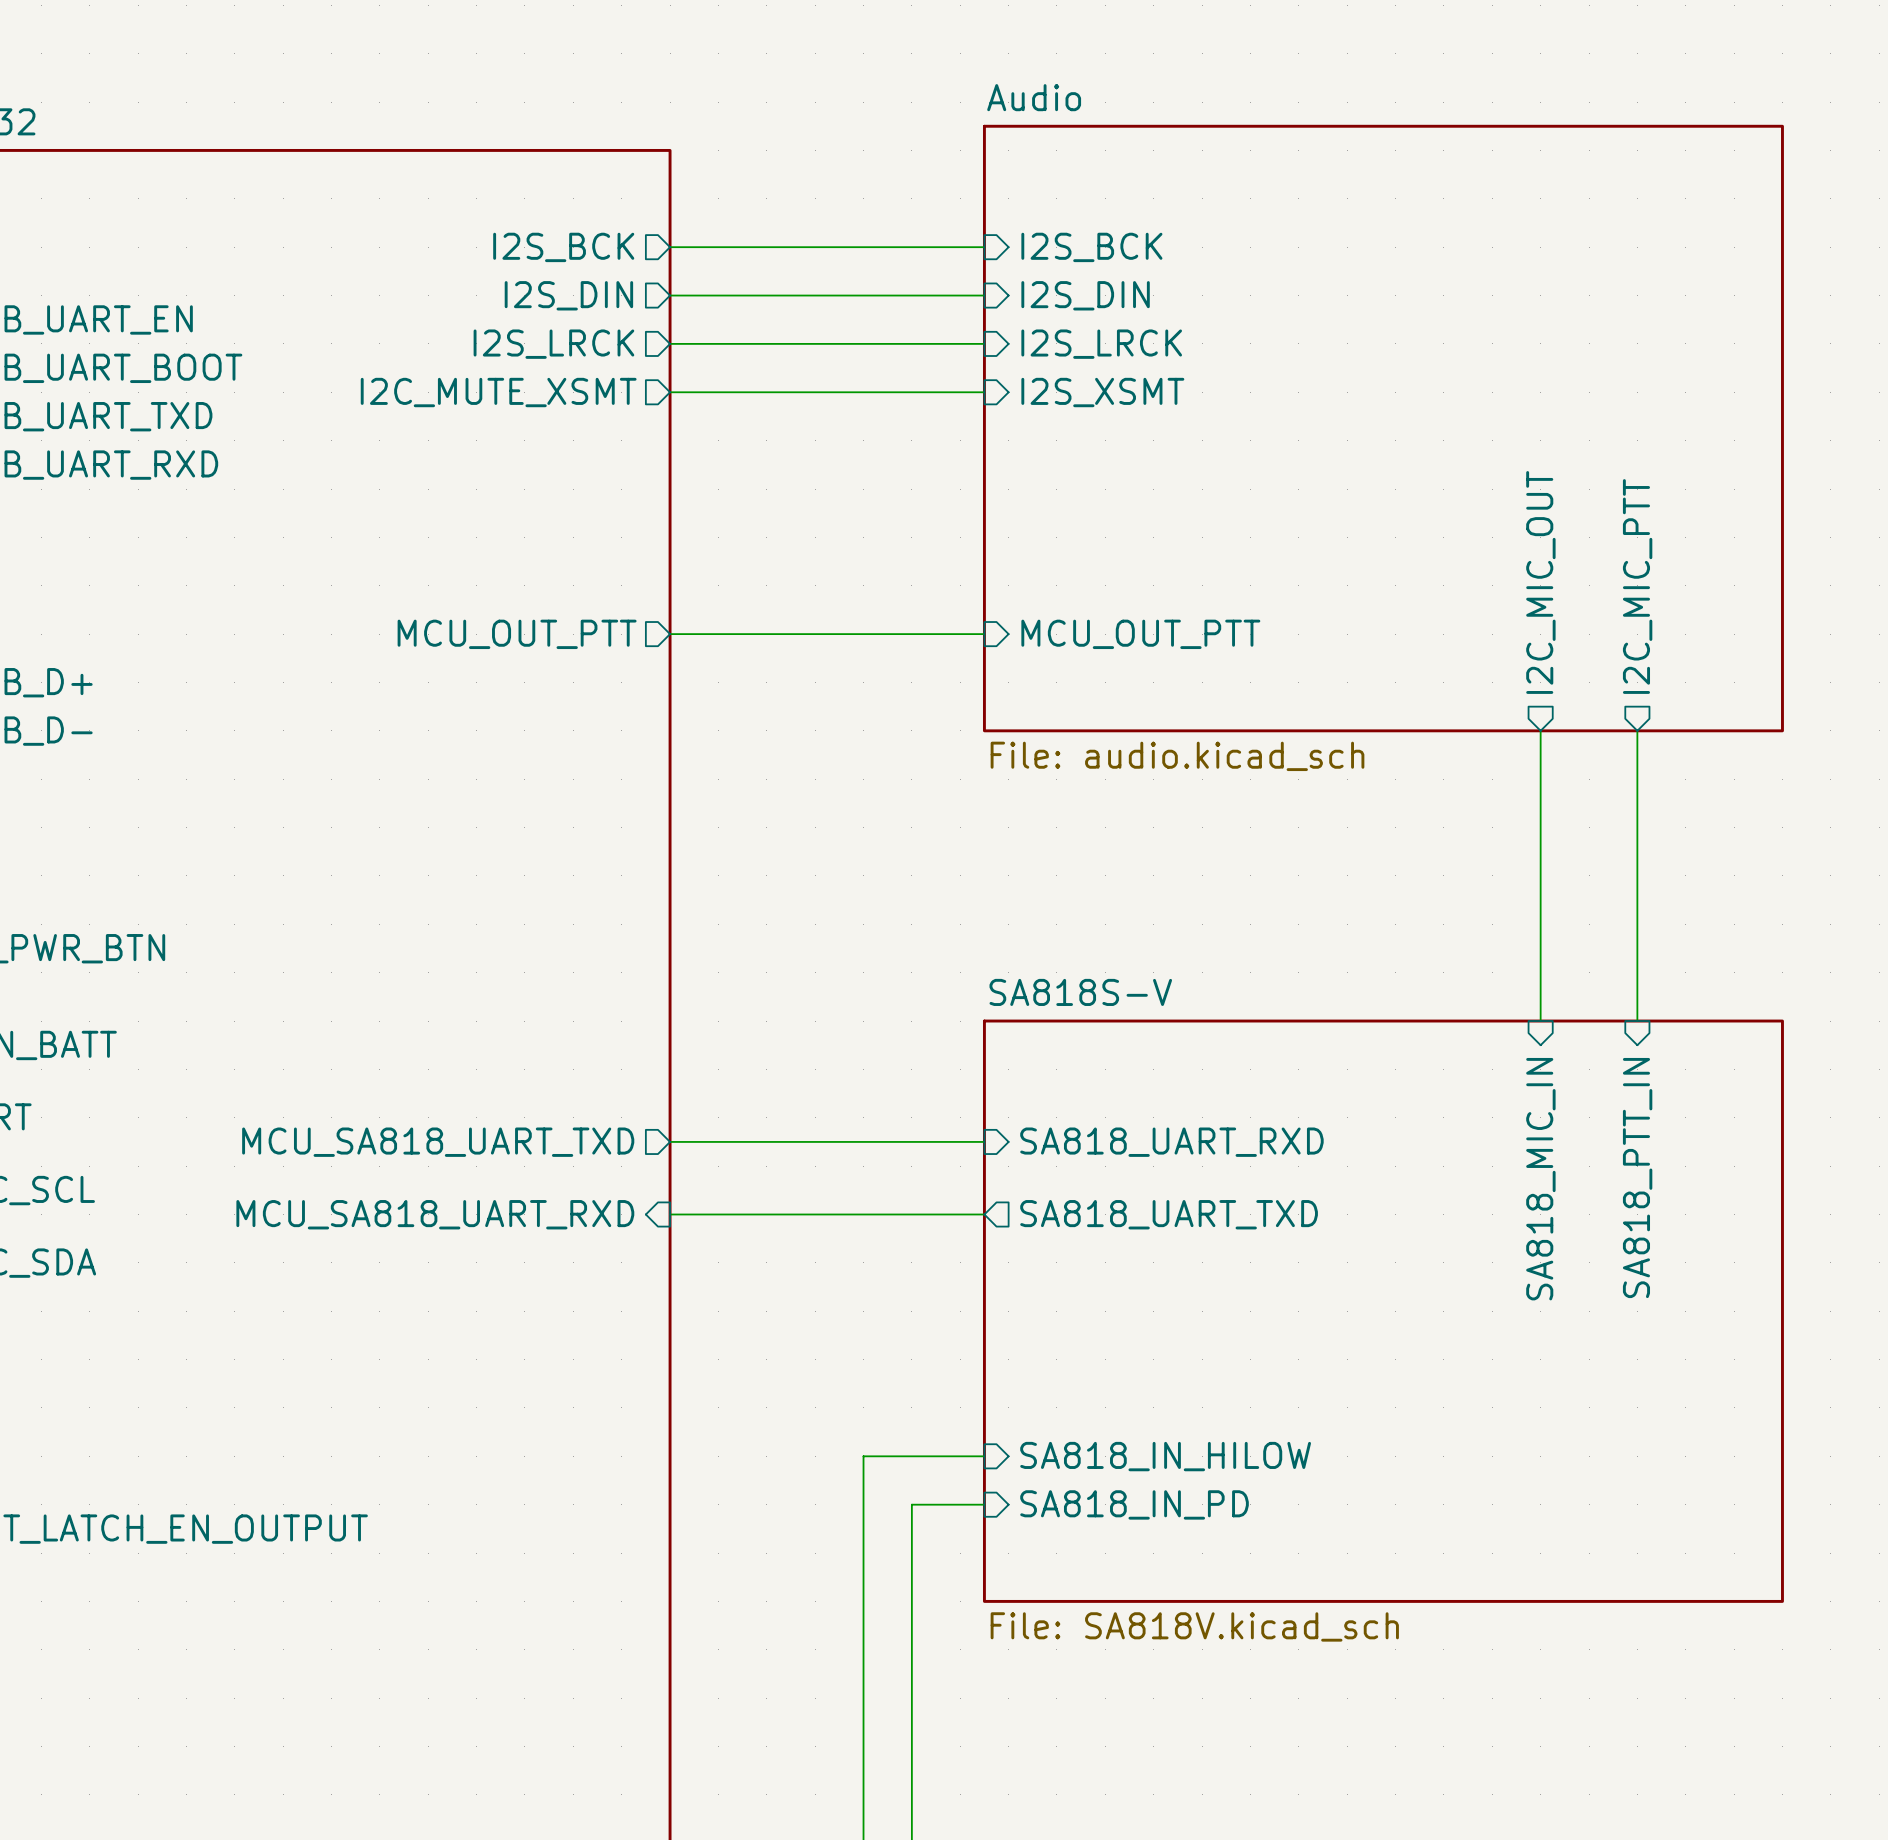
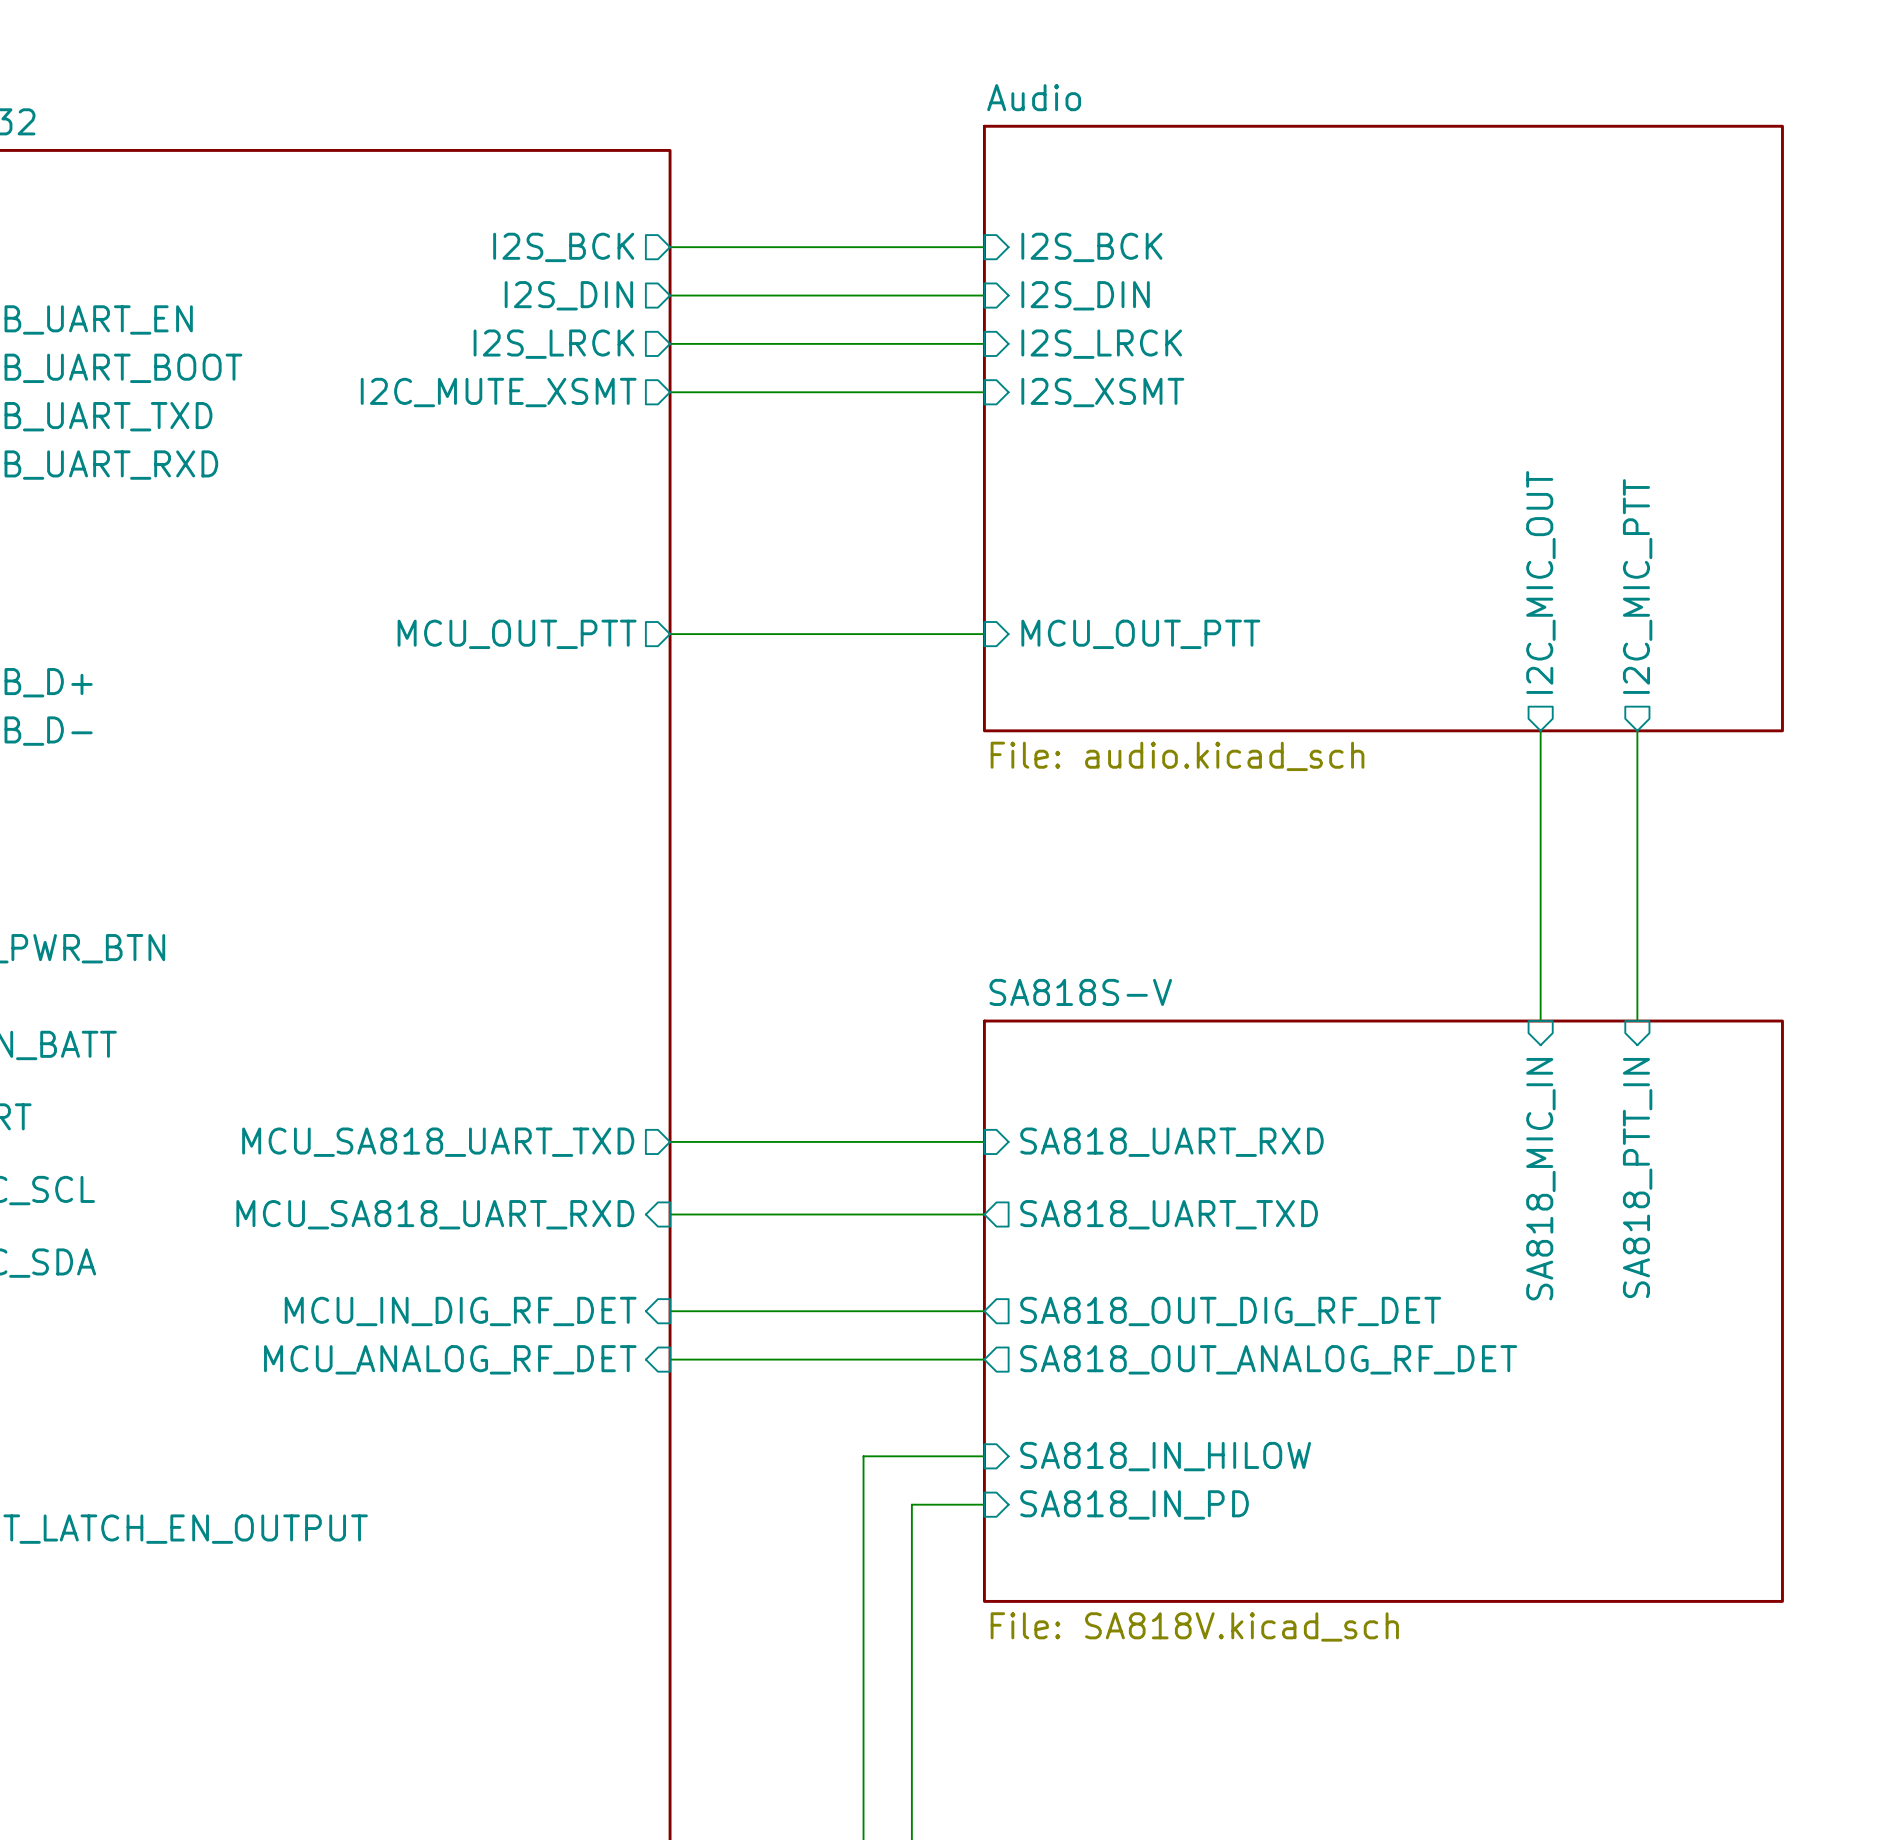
sheet pin: none -> MCU_IN_DIG_RF_DET (460, 1311)
wire: none -> (670, 1311) (984, 1311)
sheet pin: none -> SA818_OUT_DIG_RF_DET (1230, 1311)
sheet pin: none -> MCU_ANALOG_RF_DET (450, 1359)
wire: none -> (670, 1359) (984, 1359)
sheet pin: none -> SA818_OUT_ANALOG_RF_DET (1268, 1359)

